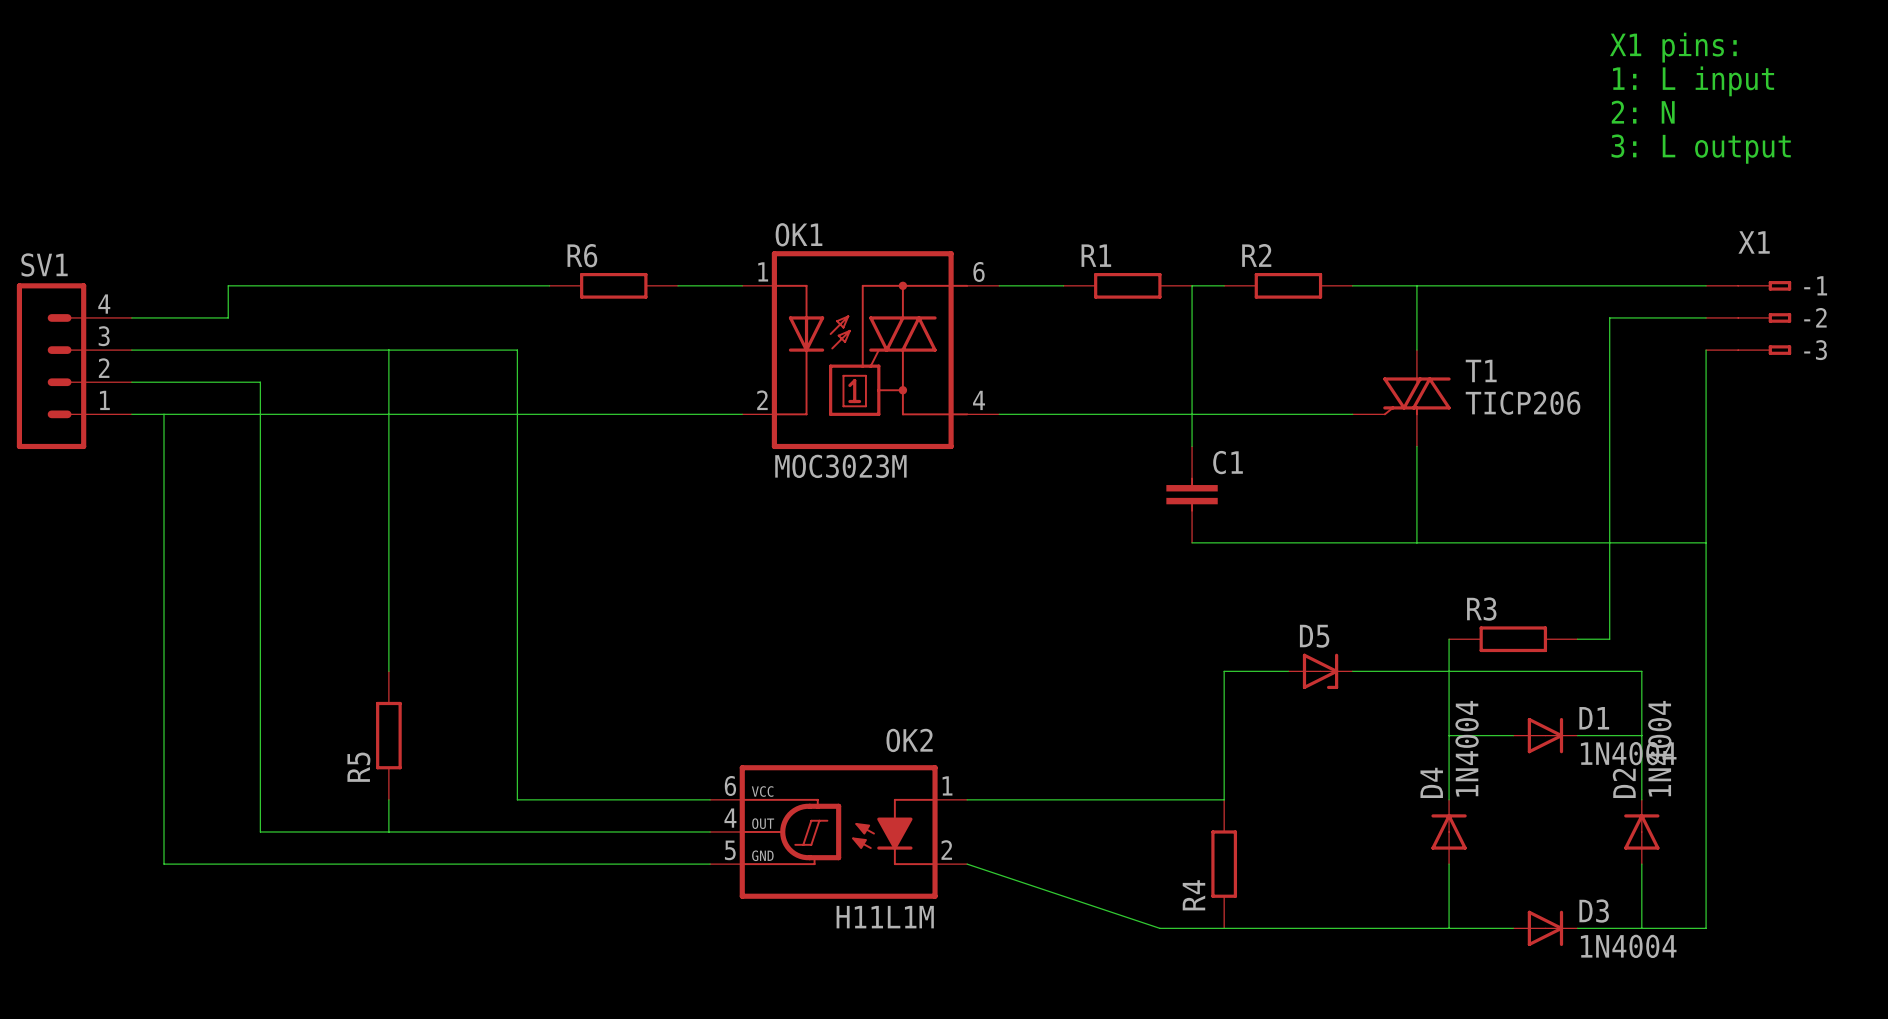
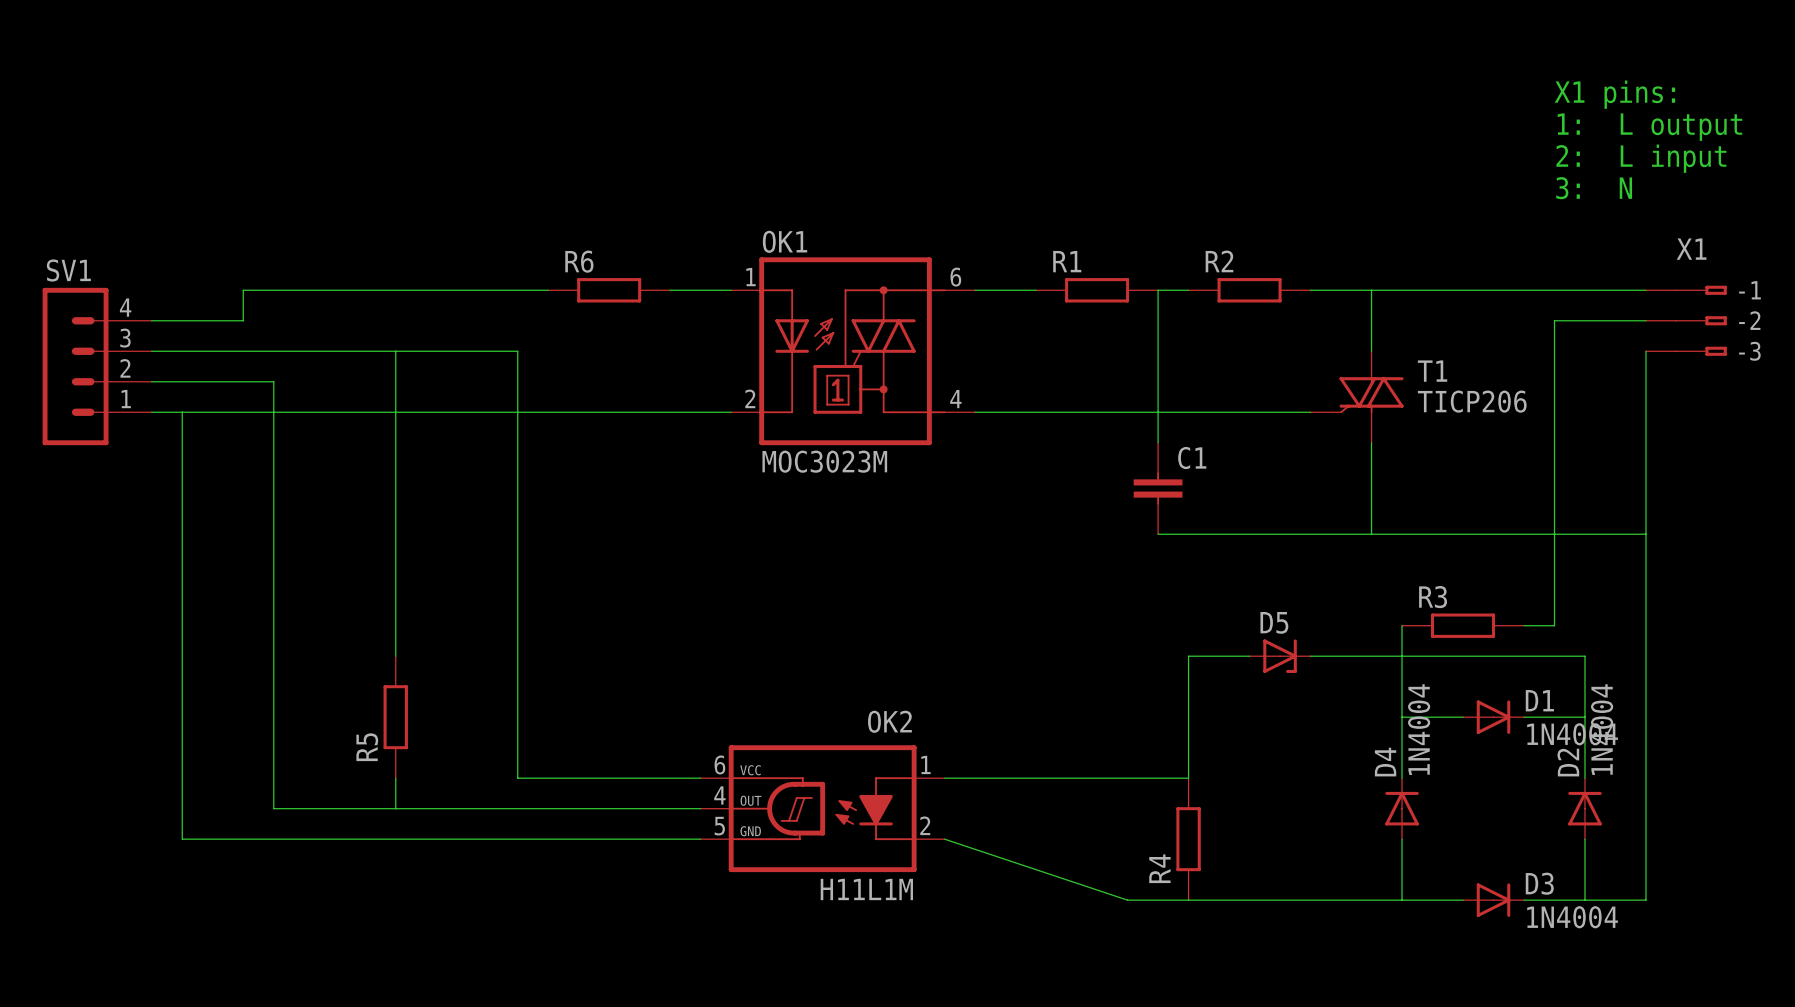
text: X1 pins: (1673, 47) -> none
text: 1: L input (1693, 81) -> X1 pins: (1614, 94)
text: 2: N (1643, 112) -> 1: L output (1649, 127)
text: 3: L output (1701, 149) -> 2: L input (1641, 158)
text: none -> 3: N (1594, 188)

